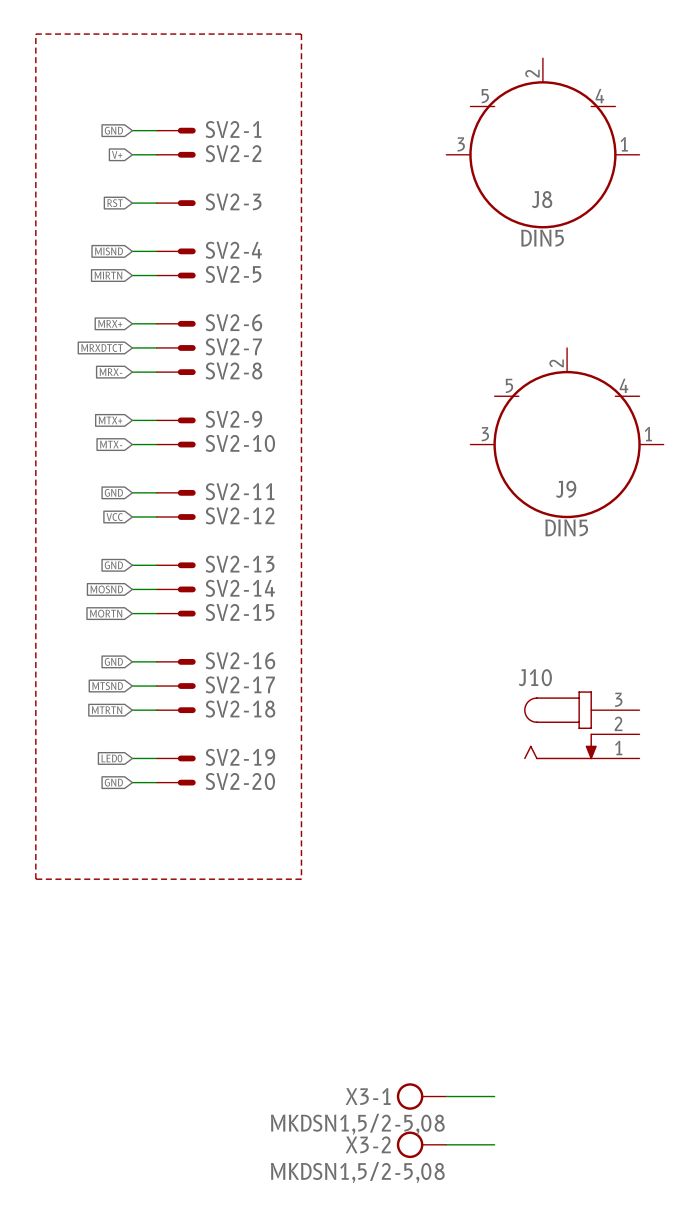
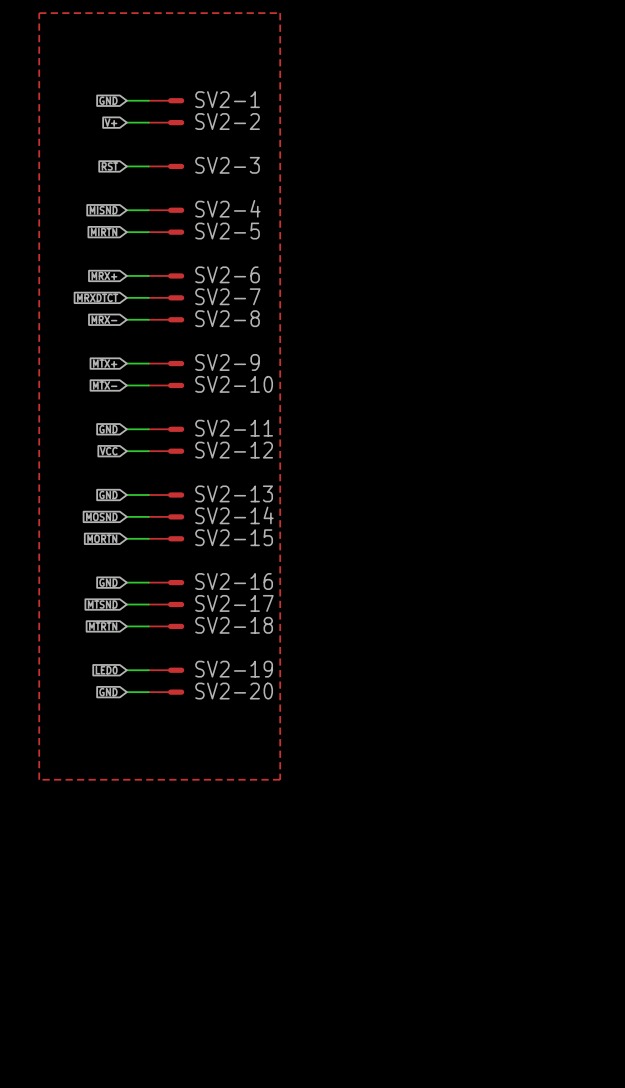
J8: DIN5 (542, 143) -> none
J9: DIN5 (567, 433) -> none
J10: (581, 725) -> none
X3-1: MKDSN1,5/2-5,08 (421, 1096) -> none
wire: (446, 1096) (494, 1096) -> none
X3-2: MKDSN1,5/2-5,08 (421, 1144) -> none
wire: (446, 1144) (494, 1144) -> none

